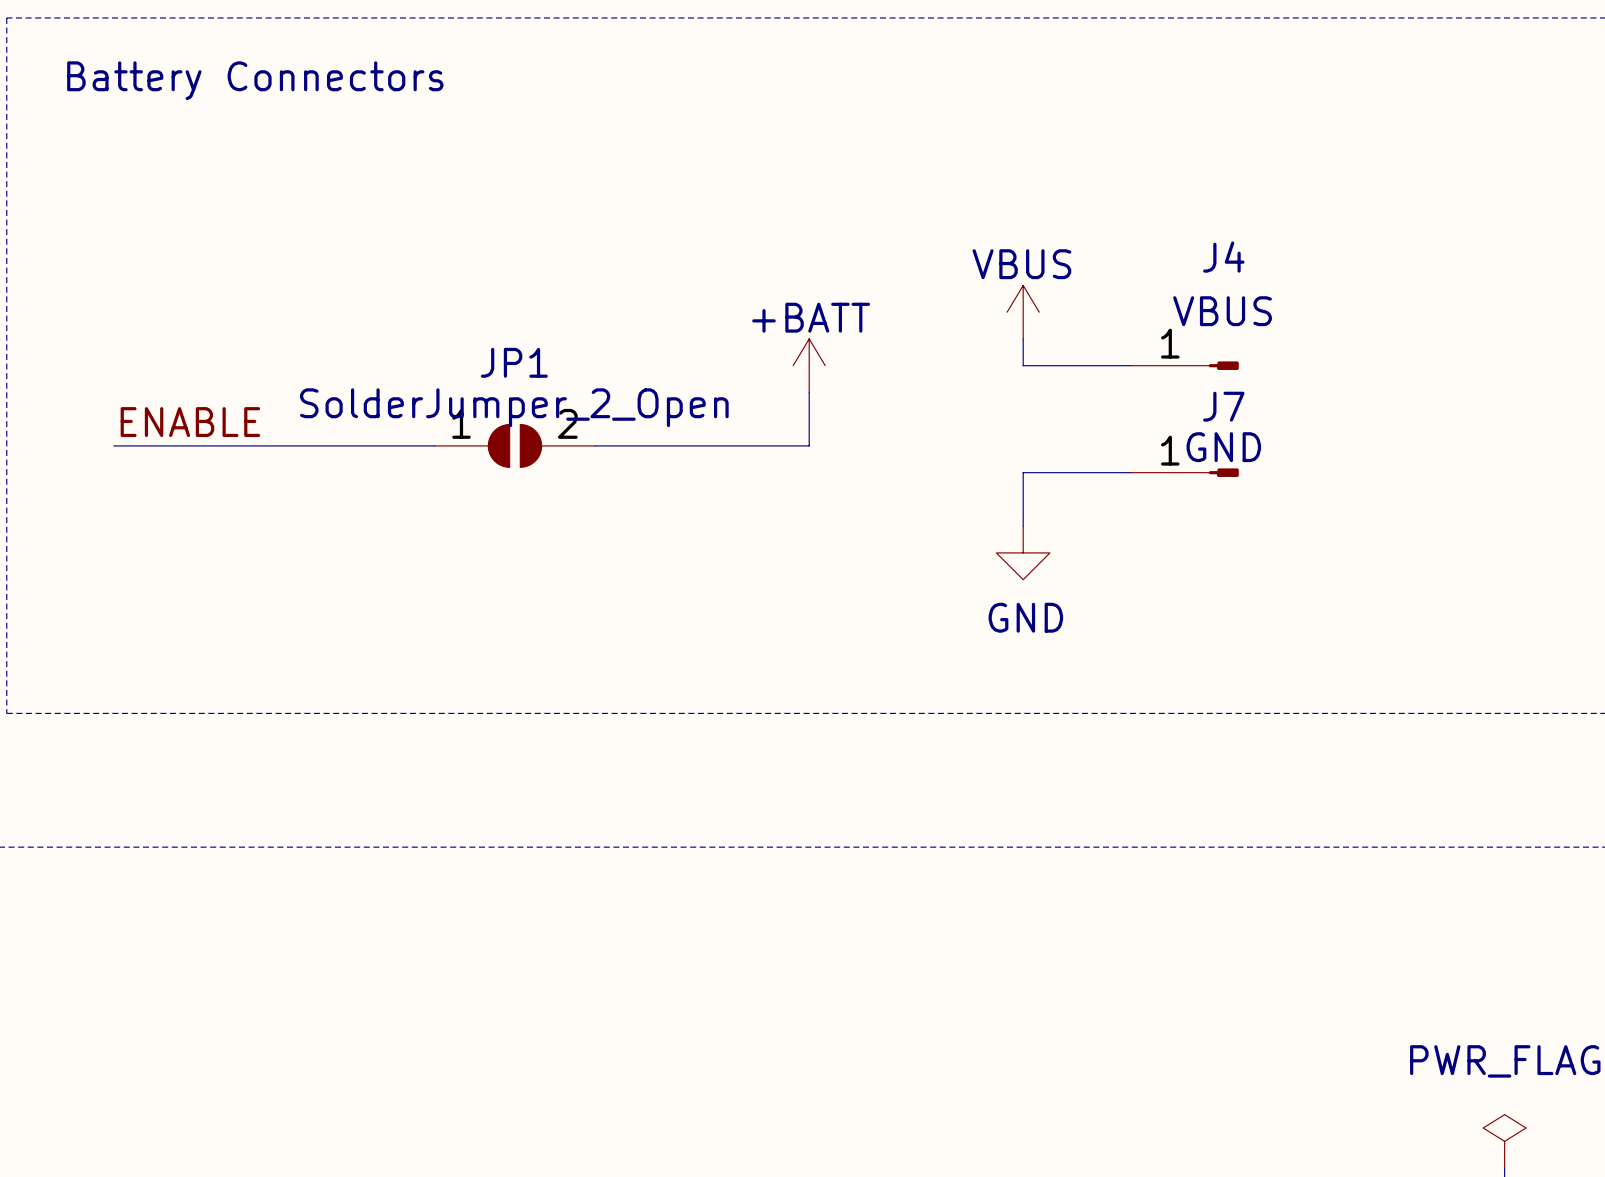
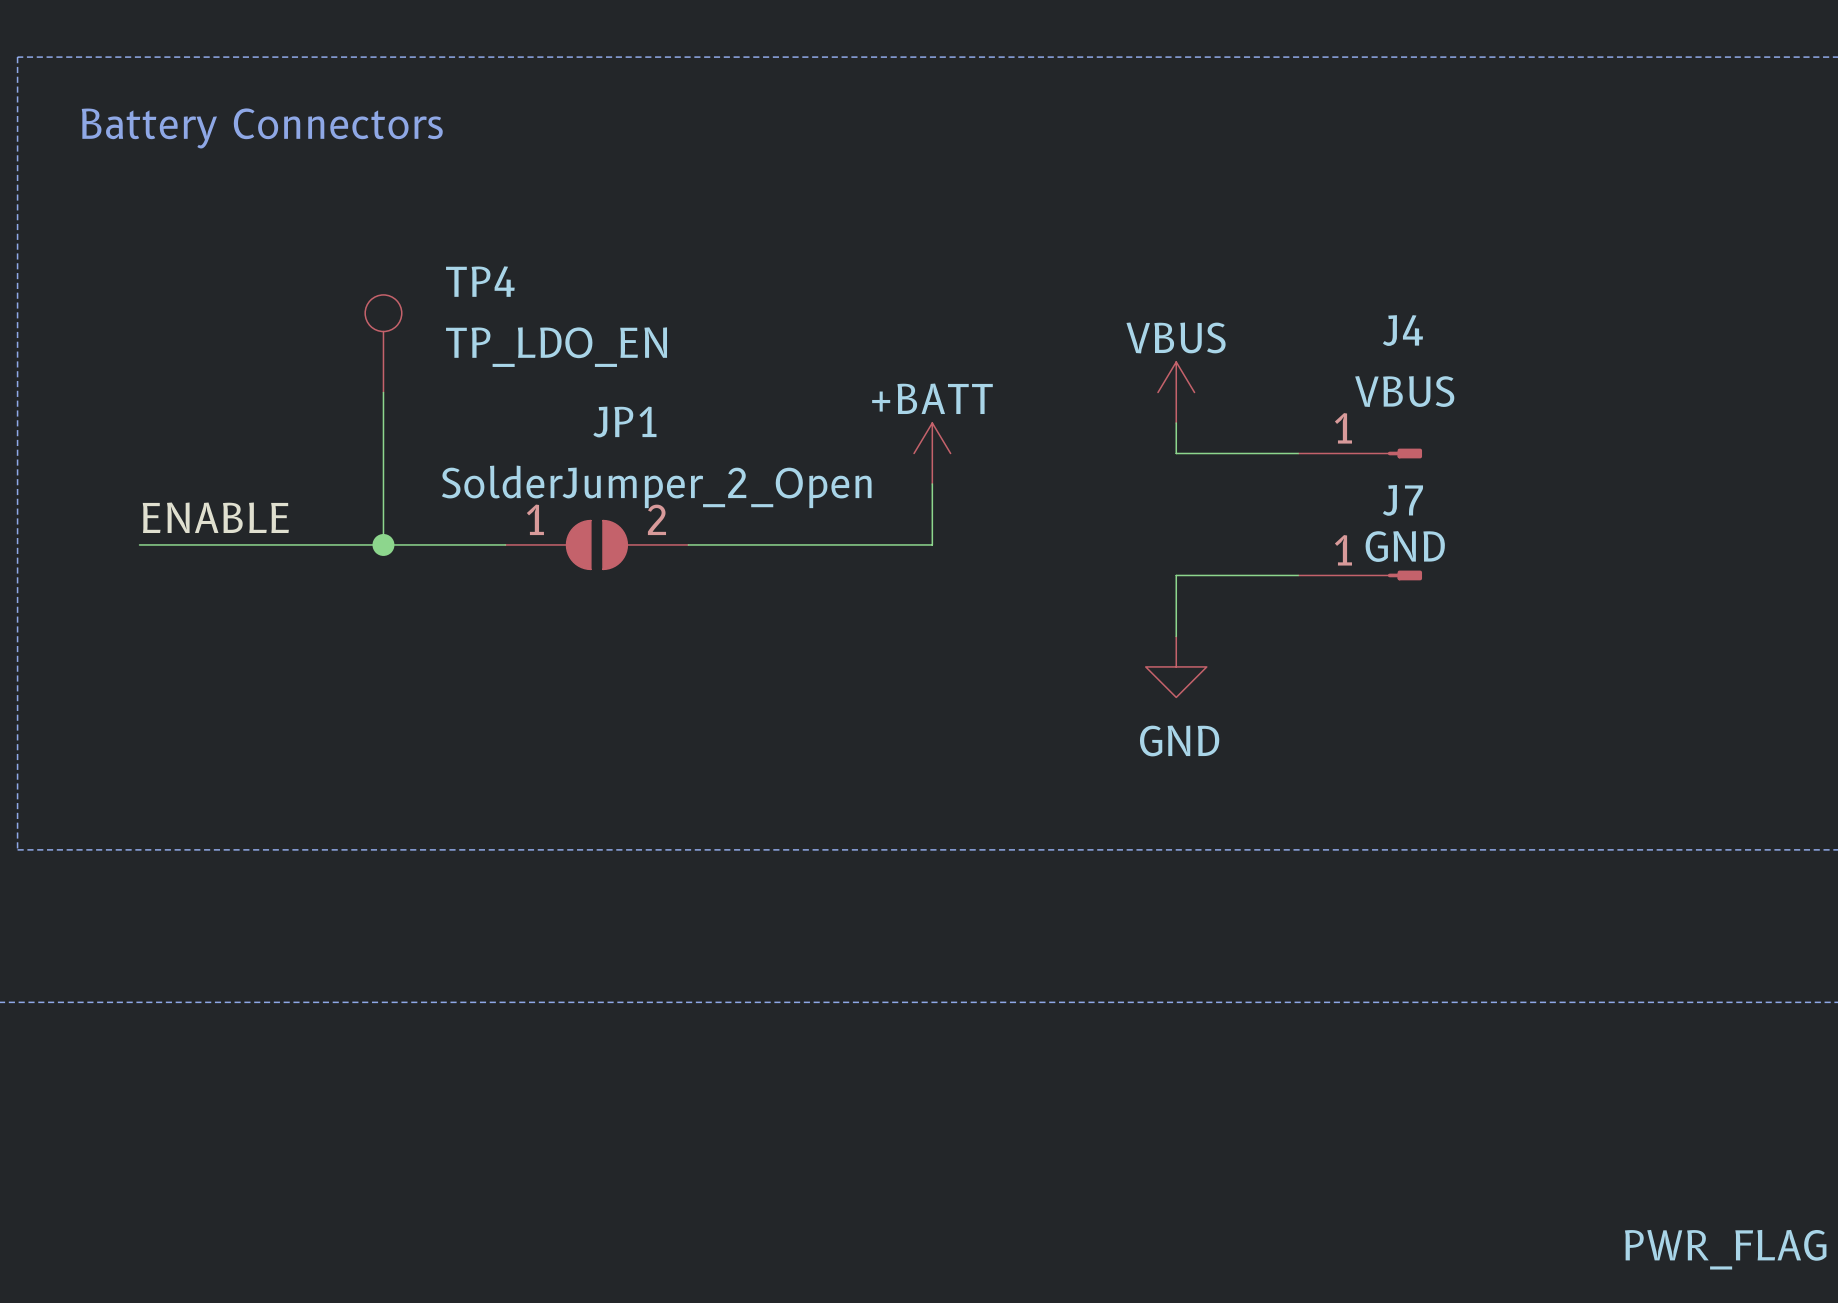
TP4: none -> TP_LDO_EN (383, 343)
wire: none -> (383, 392) (383, 544)
JP1 name position: JP1 (514, 362) -> JP1 (624, 422)
JP1 value position: SolderJumper_2_Open (514, 407) -> SolderJumper_2_Open (656, 486)
junction: none -> (383, 544)

